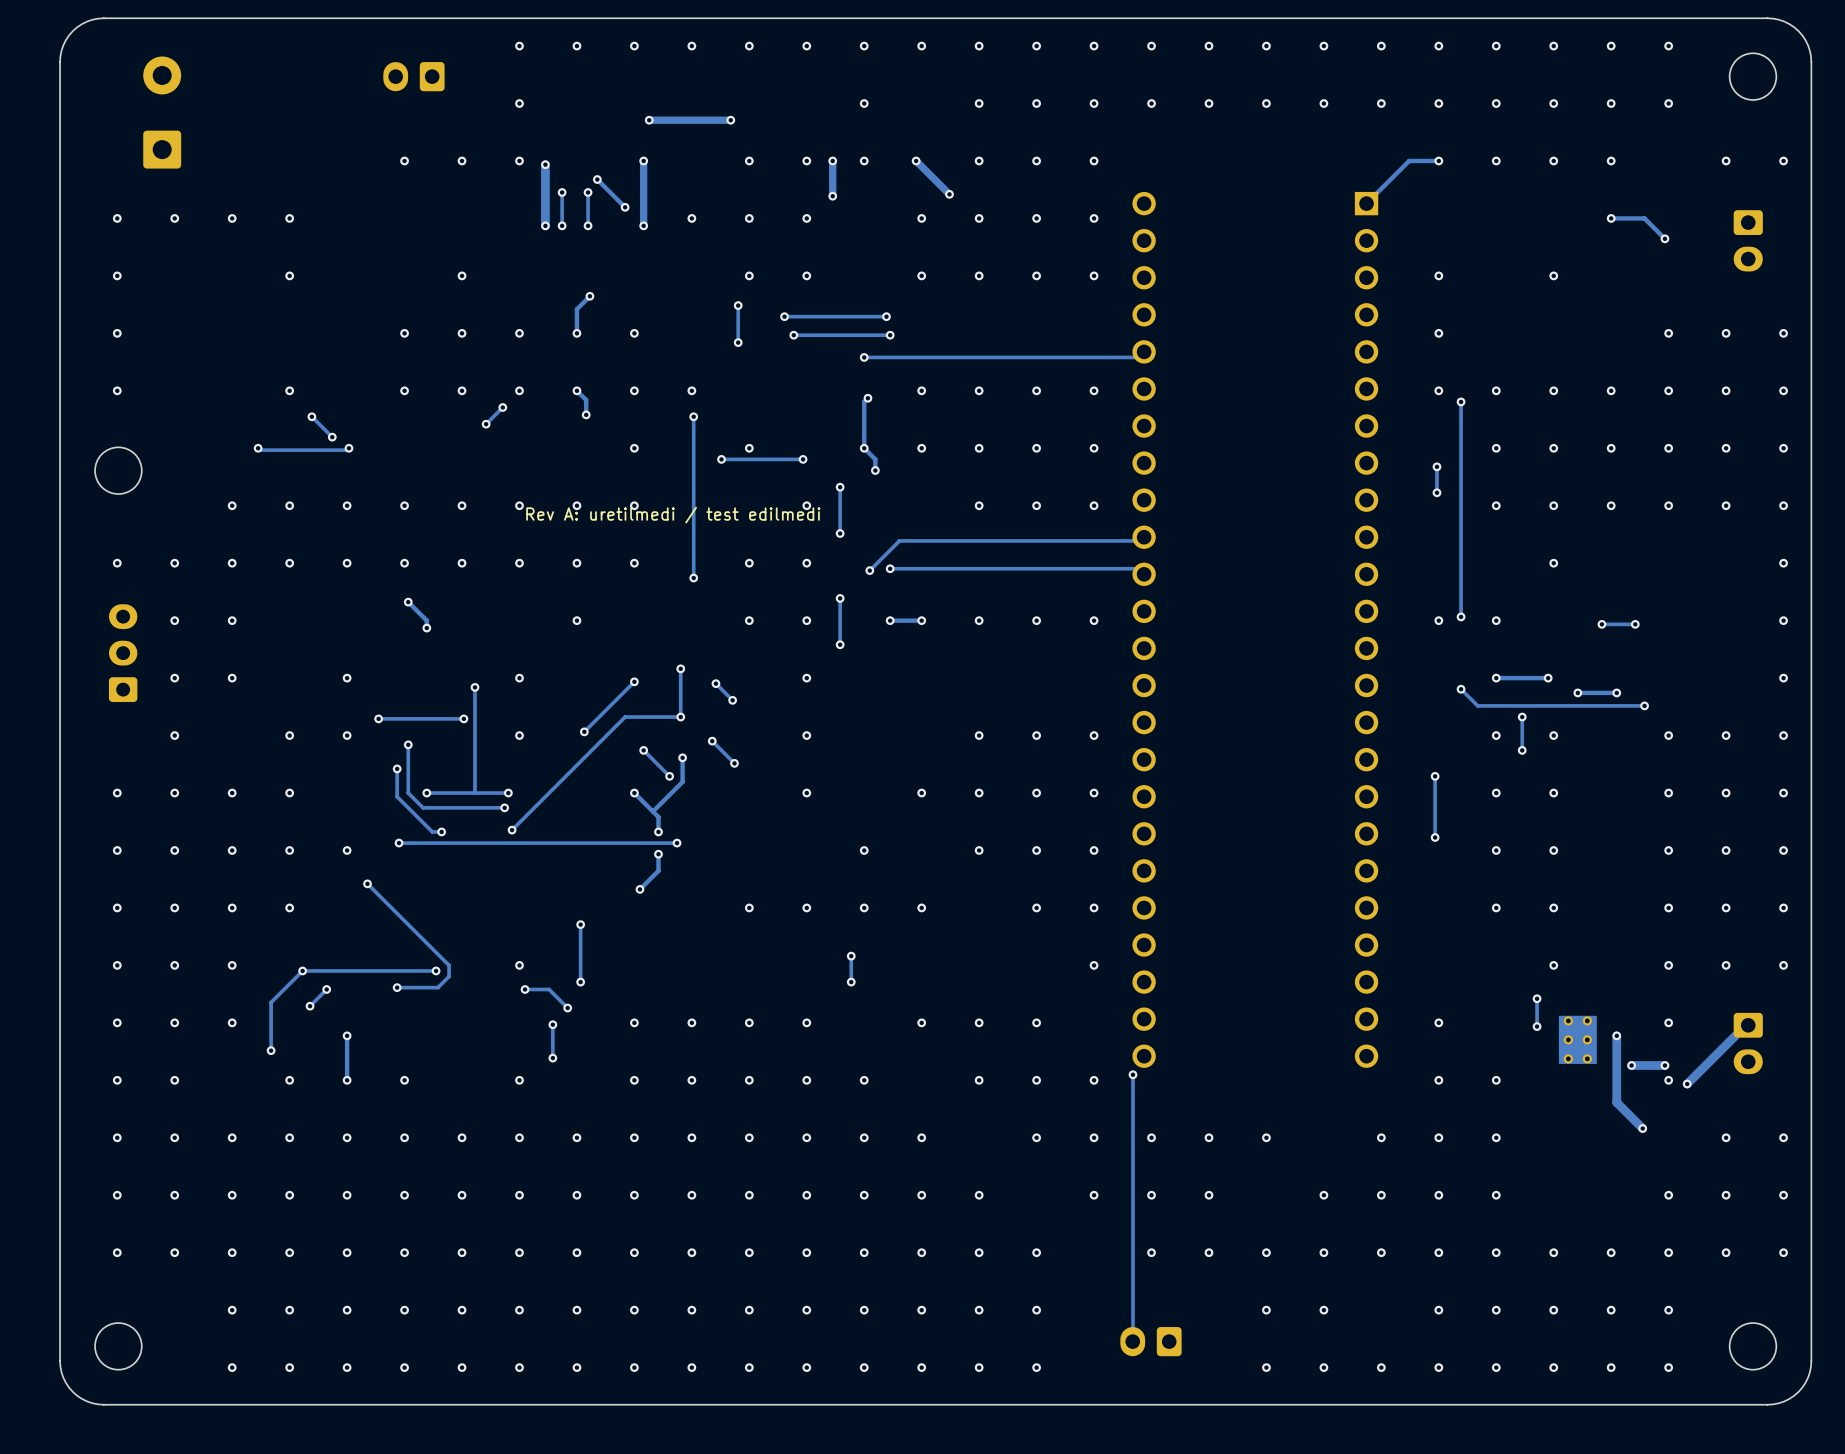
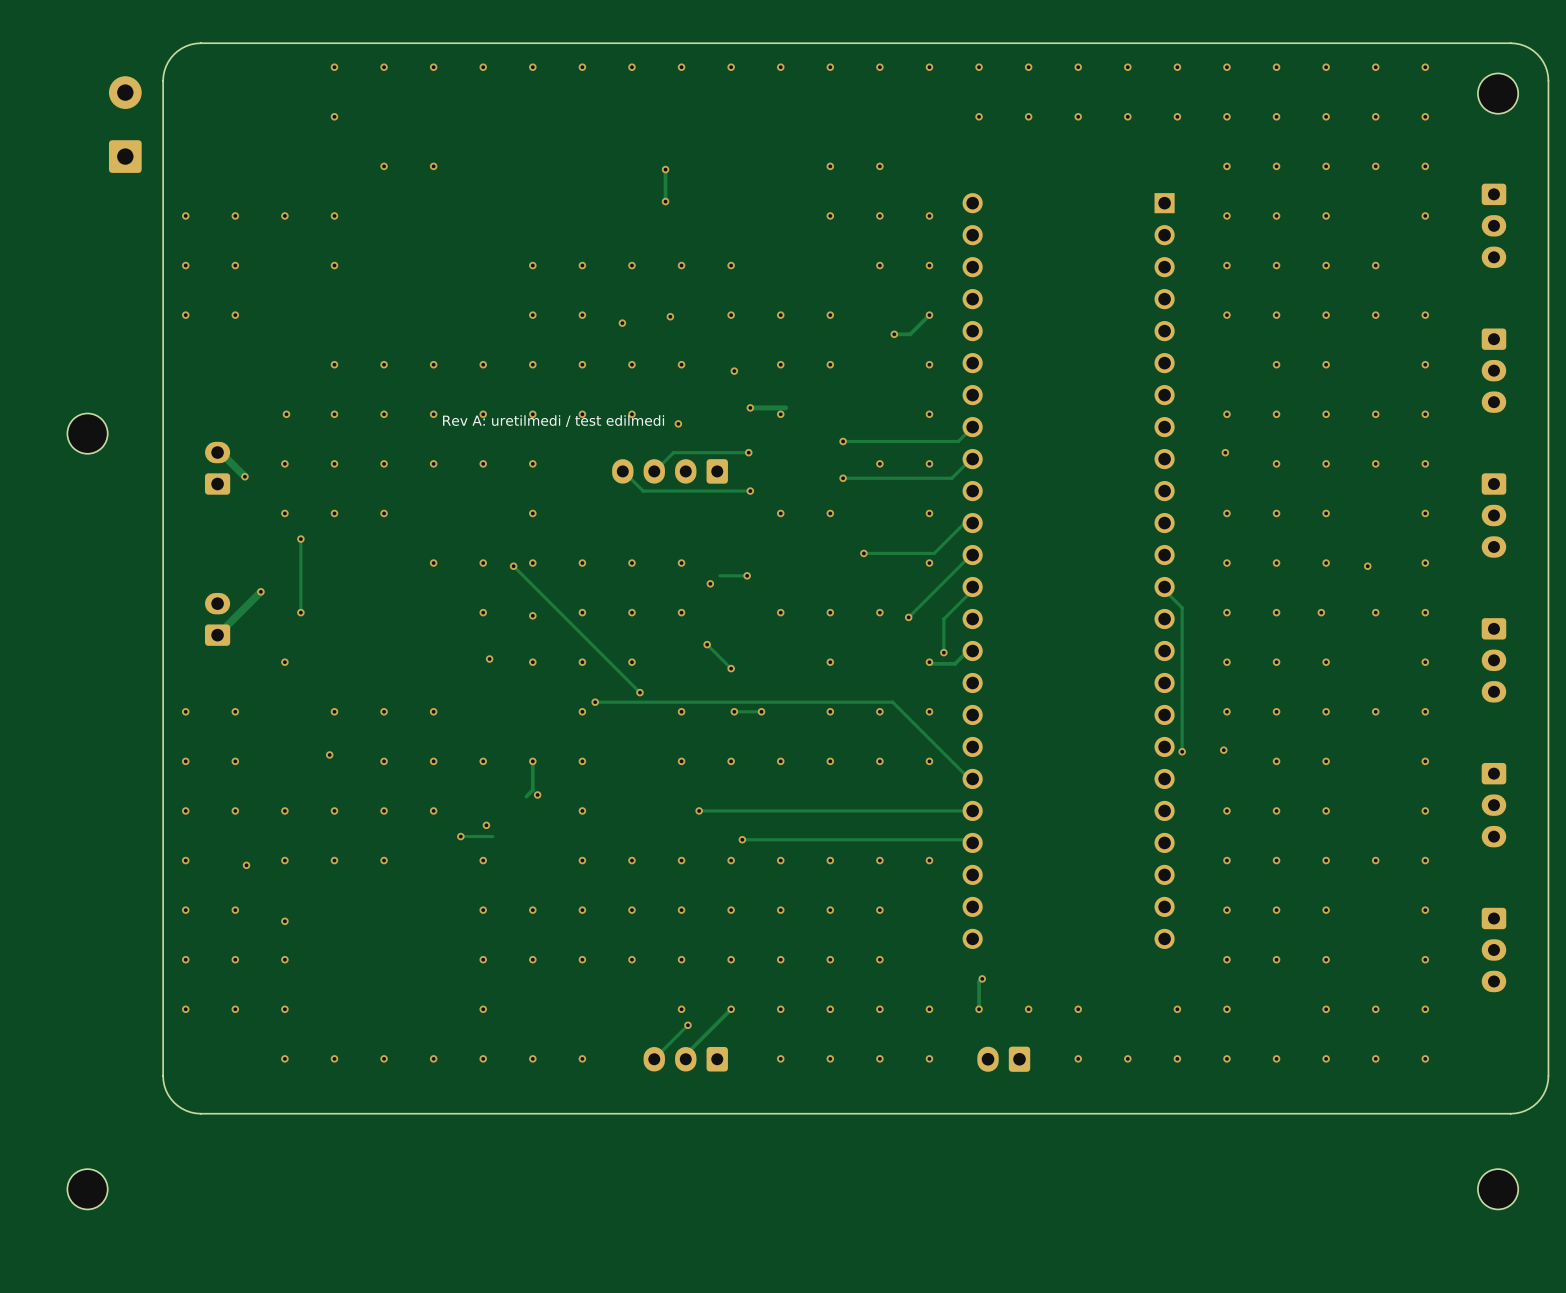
board edge: (249, 18) (92, 19) (72, 31) (63, 45) (60, 56) (60, 1360) (63, 1377) (77, 1395) (87, 1401) (103, 1404) (1773, 1404) (1789, 1398) (1798, 1391) (1809, 1372) (1811, 1215) -> (200, 43) (186, 46) (174, 54) (165, 66) (163, 81) (163, 1075) (165, 1090) (177, 1105) (191, 1112) (200, 1113) (1510, 1113) (1525, 1110) (1537, 1102) (1545, 1090) (1548, 1075)
via: none -> (334, 67)
via: none -> (384, 67)
part: (413, 76) -> none
via: none -> (334, 116)
via: (519, 103) -> none
via: (864, 103) -> none
via: (979, 103) -> none
via: (1036, 103) -> none
via: (1094, 103) -> none
via: (649, 120) -> none
track: (730, 120) (649, 120) -> none
via: (730, 120) -> none
via: (404, 160) -> none
track: (643, 160) (643, 225) -> none
via: (643, 160) -> none
via: (749, 160) -> none
via position: (806, 160) -> (665, 169)
track: (832, 160) (832, 196) -> none
via: (832, 160) -> none
via: (864, 160) -> none
track: (916, 160) (949, 194) -> none
via: (916, 160) -> none
via: (1094, 160) -> none
track: (1438, 160) (1409, 160) (1366, 203) -> none
via: none -> (1425, 166)
via: (1726, 160) -> none
via: (1783, 160) -> none
track: (545, 164) (545, 225) -> none
via: (545, 164) -> none
track: (597, 179) (625, 207) -> none
via: (597, 179) -> none
track: (562, 192) (562, 225) -> none
via: (562, 192) -> none
track: (588, 192) (588, 225) -> none
via: (588, 192) -> none
via: (949, 194) -> none
via: (832, 196) -> none
via: none -> (665, 201)
via: (625, 207) -> none
part footprint: [1733, 210, 1763, 272] -> [1481, 183, 1507, 269]
via: (117, 218) -> none
via: (174, 218) -> none
via: none -> (284, 215)
via: none -> (334, 215)
via: (691, 218) -> none
via: (749, 218) -> none
via: (806, 218) -> none
via: (921, 218) -> none
via: none -> (1226, 215)
via: none -> (1276, 215)
via: none -> (1326, 215)
track: (1611, 218) (1644, 218) (1664, 238) -> none
via: (1611, 218) -> none
via: (545, 225) -> none
via: (562, 225) -> none
via: (588, 225) -> none
via: (643, 225) -> none
via position: (1664, 238) -> (1425, 215)
via: (117, 275) -> none
via: none -> (185, 265)
via: none -> (334, 265)
via: (462, 275) -> none
via: none -> (532, 265)
via: none -> (582, 265)
via: none -> (731, 265)
via: (921, 275) -> none
via: (979, 275) -> none
via: none -> (1276, 265)
via: none -> (1375, 265)
track: (589, 296) (576, 309) (576, 333) -> none
via: (589, 296) -> none
track: (738, 305) (738, 342) -> (665, 169) (665, 201)
via: (738, 305) -> none
via: (784, 316) -> none
track: (886, 316) (784, 316) -> none
via: (886, 316) -> none
via: (117, 333) -> none
via: none -> (185, 315)
via: none -> (235, 315)
via: (404, 333) -> none
via: (462, 333) -> none
via: (519, 333) -> none
via: (576, 333) -> none
via: none -> (582, 315)
via: none -> (731, 315)
via: none -> (780, 315)
via: none -> (830, 315)
track: none -> (929, 315) (910, 334) (894, 334)
via: none -> (929, 315)
via: none -> (1276, 315)
via: none -> (1326, 315)
via: none -> (1375, 315)
via: (1726, 333) -> none
via: (1783, 333) -> none
track: (890, 335) (793, 335) -> none
via: (890, 335) -> none
via: (864, 357) -> none
track: (1134, 357) (864, 357) -> none
via: (117, 390) -> none
via: (289, 390) -> none
track: (576, 390) (586, 400) (586, 414) -> none
via: none -> (631, 364)
via: none -> (681, 364)
via position: (1036, 390) -> (894, 334)
via: (1438, 390) -> none
via: (1611, 390) -> none
via: (1726, 390) -> none
via: (1783, 390) -> none
part: none -> (1493, 370)
track: (867, 398) (864, 401) (864, 448) (875, 459) (875, 470) -> none
track: (1461, 401) (1461, 616) -> none
via: (1461, 401) -> none
track: (502, 407) (486, 424) -> none
via: (502, 407) -> none
via position: (586, 414) -> (483, 414)
track: (311, 416) (332, 437) -> none
via: (311, 416) -> none
track: (693, 416) (693, 578) -> none
via: (693, 416) -> none
via: (486, 424) -> none
via: (332, 437) -> none
via: none -> (750, 407)
track: none -> (785, 407) (750, 407)
via: (258, 448) -> none
track: (348, 448) (347, 450) (259, 450) (258, 448) -> none
via: none -> (334, 414)
via: none -> (384, 414)
via: none -> (433, 414)
via: none -> (582, 414)
via: (864, 448) -> none
via: (979, 448) -> none
via: (1036, 448) -> none
via: (1726, 448) -> none
via: (1783, 448) -> none
via: (721, 459) -> none
track: (803, 459) (721, 459) -> none
track: none -> (972, 427) (958, 441) (843, 441)
track: (1436, 466) (1436, 492) -> none
via position: (1436, 466) -> (1226, 414)
via: (875, 470) -> none
via: none -> (843, 441)
track: (840, 487) (840, 533) -> none
via: (840, 487) -> none
track: none -> (217, 452) (225, 457) (244, 476)
track: none -> (748, 452) (673, 452) (654, 471)
via: none -> (748, 452)
track: none -> (972, 459) (951, 478) (843, 478)
via: (232, 505) -> none
via position: (289, 505) -> (244, 476)
via: (806, 505) -> none
via: (979, 505) -> none
via: (1726, 505) -> none
via: (1783, 505) -> none
part: none -> (217, 468)
track: none -> (622, 471) (643, 491) (750, 491)
part: none -> (670, 471)
text position: Rev A: uretilmedi / test edilmedi (673, 515) -> Rev A: uretilmedi / test edilmedi (553, 421)
via: none -> (843, 478)
via: (840, 533) -> none
via: none -> (750, 491)
track: (1144, 537) (1134, 540) (899, 540) (869, 570) -> none
via: (117, 563) -> none
via: (174, 563) -> none
via: (232, 563) -> none
via: (289, 563) -> none
via: (519, 563) -> none
via: (576, 563) -> none
via: (749, 563) -> none
via: (806, 563) -> none
via: none -> (780, 513)
via: none -> (830, 513)
via: none -> (929, 513)
via: none -> (1226, 513)
via: none -> (1276, 513)
via: none -> (1425, 513)
via: (1783, 563) -> none
part: none -> (1493, 515)
track: (890, 568) (1134, 568) (1144, 574) -> (863, 553) (934, 553) (964, 523) (972, 523)
via: (890, 568) -> none
via: (869, 570) -> none
via: (693, 578) -> none
track: none -> (300, 539) (300, 612)
via: none -> (300, 539)
track: (840, 598) (840, 644) -> none
via: (840, 598) -> none
track: (408, 602) (426, 620) (426, 628) -> none
via: (408, 602) -> none
via: none -> (863, 553)
track: none -> (972, 555) (908, 617)
via: (1461, 616) -> none
via: (174, 620) -> none
via: (232, 620) -> none
via: none -> (433, 563)
via: none -> (532, 563)
via: none -> (582, 563)
via position: (890, 620) -> (747, 575)
track: (921, 620) (890, 620) -> (747, 575) (719, 575)
via: (921, 620) -> none
via: (979, 620) -> none
via: (1036, 620) -> none
via: none -> (1326, 563)
via: none -> (1425, 563)
via: (1783, 620) -> none
track: none -> (513, 566) (639, 692)
via: none -> (513, 566)
track: (1635, 624) (1601, 624) -> none
via: (1635, 624) -> none
via: (426, 628) -> none
track: none -> (972, 587) (967, 595) (943, 619) (943, 652)
track: none -> (1164, 587) (1169, 595) (1182, 607) (1182, 751)
part: (123, 653) -> none
track: none -> (260, 591) (217, 635)
via: none -> (260, 591)
track: (680, 668) (680, 717) (625, 717) (512, 830) -> none
via: (680, 668) -> none
via: (174, 678) -> none
via: (232, 678) -> none
via: (347, 678) -> none
via: none -> (300, 612)
via: (519, 678) -> none
via: none -> (483, 612)
via: none -> (582, 612)
via: none -> (631, 612)
via: none -> (780, 612)
via: none -> (830, 612)
via: none -> (879, 612)
track: (1548, 678) (1496, 678) -> none
via: none -> (1425, 612)
via: (1783, 678) -> none
track: (634, 681) (584, 731) -> none
track: (715, 683) (732, 700) -> none
via: (715, 683) -> none
via: none -> (908, 617)
part: none -> (217, 619)
track: (475, 687) (475, 793) -> none
via: (475, 687) -> none
track: (1461, 689) (1477, 705) (1644, 705) -> none
via position: (1461, 689) -> (1226, 612)
via: (1577, 692) -> none
track: (1616, 692) (1577, 692) -> none
via position: (1616, 692) -> (1375, 612)
via: (732, 700) -> none
via: (1644, 705) -> none
track: none -> (707, 644) (731, 668)
via: none -> (707, 644)
via: (680, 717) -> none
track: (1522, 717) (1522, 750) -> none
via: (1522, 717) -> none
via: (378, 718) -> none
track: (463, 718) (378, 718) -> none
via: (463, 718) -> none
track: none -> (972, 651) (964, 654) (955, 663) (929, 662)
via: none -> (943, 652)
part: none -> (1493, 660)
via: (174, 735) -> none
via: (289, 735) -> none
via: (519, 735) -> none
via: none -> (582, 662)
via: none -> (631, 662)
via: (806, 735) -> none
via: (1036, 735) -> none
via: none -> (1226, 662)
via: (1726, 735) -> none
via: (1783, 735) -> none
track: (712, 741) (734, 763) -> none
via: (712, 741) -> none
via: none -> (731, 668)
track: (408, 744) (408, 793) (423, 807) (504, 807) -> none
via: (408, 744) -> none
track: (643, 750) (669, 776) -> none
via position: (643, 750) -> (532, 662)
via: (1522, 750) -> none
track: (682, 757) (682, 781) (652, 811) -> none
via: (682, 757) -> none
via: (734, 763) -> none
track: (397, 768) (397, 796) (432, 831) (441, 831) -> none
via: (397, 768) -> none
via: none -> (639, 692)
via: (669, 776) -> none
track: (1435, 776) (1435, 837) -> none
via position: (1435, 776) -> (1226, 711)
track: none -> (595, 702) (892, 702) (964, 774) (972, 778)
via: none -> (595, 702)
via: (117, 793) -> none
via: (174, 793) -> none
via: none -> (334, 711)
via: (426, 793) -> none
via: none -> (384, 711)
track: (508, 793) (426, 793) -> none
via: (508, 793) -> none
via: none -> (433, 711)
track: (634, 793) (658, 817) (658, 831) -> none
via: (634, 793) -> none
via: none -> (582, 711)
via: none -> (734, 711)
track: none -> (761, 711) (734, 711)
via position: (921, 793) -> (761, 711)
via: none -> (1375, 711)
via: (1726, 793) -> none
via: (1783, 793) -> none
via: (504, 807) -> none
via: (512, 830) -> none
via: (441, 831) -> none
via: (658, 831) -> none
via: none -> (1182, 751)
track: (677, 843) (399, 843) -> none
via position: (677, 843) -> (582, 761)
via: (117, 850) -> none
via: (174, 850) -> none
via: (347, 850) -> none
via: none -> (384, 761)
via: none -> (433, 761)
via: none -> (483, 761)
track: none -> (532, 761) (532, 790) (526, 796)
via: none -> (532, 761)
via: none -> (681, 761)
via: none -> (780, 761)
via: (1726, 850) -> none
via: (1783, 850) -> none
track: (658, 854) (658, 870) (639, 889) -> none
via: (658, 854) -> none
track: (367, 883) (449, 965) (449, 976) (437, 987) (397, 987) -> none
via: (367, 883) -> none
part: none -> (1493, 805)
via: (117, 907) -> none
via: (174, 907) -> none
via: none -> (284, 810)
via: none -> (334, 810)
via: none -> (384, 810)
via: none -> (433, 810)
via: none -> (582, 810)
via: (749, 907) -> none
via: (806, 907) -> none
via: none -> (699, 810)
via: (864, 907) -> none
via: (921, 907) -> none
via: (1036, 907) -> none
via: (1094, 907) -> none
track: none -> (972, 810) (699, 810)
via: none -> (1226, 810)
via: (1726, 907) -> none
via: (1783, 907) -> none
track: (580, 924) (580, 982) -> none
via: none -> (460, 836)
track: none -> (492, 836) (460, 836)
track: none -> (742, 839) (964, 839) (972, 842)
via: none -> (742, 839)
track: (851, 956) (851, 982) -> none
via: (851, 956) -> none
via: (117, 965) -> none
via: (174, 965) -> none
via: none -> (284, 860)
via: none -> (334, 860)
via: none -> (384, 860)
via: (519, 965) -> none
via: none -> (582, 860)
via: none -> (631, 860)
via: none -> (681, 860)
via: none -> (731, 860)
via: none -> (780, 860)
via: none -> (830, 860)
via: none -> (879, 860)
via: none -> (1226, 860)
via: none -> (1276, 860)
via: none -> (1375, 860)
via: (1726, 965) -> none
via: (1783, 965) -> none
track: (436, 970) (302, 970) (271, 1002) (271, 1050) -> none
via: (436, 970) -> none
via position: (580, 982) -> (483, 860)
via: (851, 982) -> none
via: (397, 987) -> none
track: (326, 989) (310, 1006) -> none
via: (326, 989) -> none
track: (525, 989) (549, 989) (567, 1008) -> none
via: (525, 989) -> none
track: (1537, 998) (1537, 1026) -> none
via: (1537, 998) -> none
via: (310, 1006) -> none
via: (567, 1008) -> none
via: (117, 1022) -> none
via: (174, 1022) -> none
via: none -> (235, 910)
via: none -> (483, 910)
via: none -> (731, 910)
via: none -> (1276, 910)
via: none -> (1326, 910)
track: (552, 1024) (552, 1058) -> none
via: (552, 1024) -> none
via: (1537, 1026) -> none
track: (347, 1035) (347, 1080) -> none
track: (1616, 1035) (1616, 1102) (1642, 1128) -> none
via: (1616, 1035) -> none
track: (1735, 1035) (1687, 1084) -> none
part: (1577, 1039) -> none
part: (1748, 1043) -> none
via: (271, 1050) -> none
via: (552, 1058) -> none
via: (1631, 1065) -> none
track: (1664, 1065) (1631, 1065) -> none
via: (1664, 1065) -> none
part: none -> (1493, 949)
track: (1132, 1074) (1132, 1341) -> none
via: (1132, 1074) -> none
via: (117, 1080) -> none
via: (174, 1080) -> none
via: none -> (185, 959)
via: (404, 1080) -> none
via: (519, 1080) -> none
via: none -> (483, 959)
via: none -> (780, 959)
via: (1094, 1080) -> none
via: none -> (1326, 959)
via: (1687, 1084) -> none
track: none -> (982, 978) (979, 982) (979, 1009)
via: none -> (982, 978)
via: (1642, 1128) -> none
via: (117, 1137) -> none
via: (174, 1137) -> none
via: (404, 1137) -> none
via: (462, 1137) -> none
via: (519, 1137) -> none
via: (634, 1137) -> none
via: (691, 1137) -> none
via: (749, 1137) -> none
track: none -> (731, 1009) (691, 1049) (685, 1059)
via: none -> (830, 1009)
via: (1496, 1137) -> none
via: none -> (1326, 1009)
via: none -> (1375, 1009)
via: none -> (1425, 1009)
via: (1726, 1137) -> none
via: (1783, 1137) -> none
track: none -> (687, 1025) (654, 1059)
via: none -> (687, 1025)
via: (117, 1195) -> none
via: (174, 1195) -> none
via: (232, 1195) -> none
via: (289, 1195) -> none
via: (749, 1195) -> none
via: (806, 1195) -> none
part: none -> (685, 1059)
via: (864, 1195) -> none
via: none -> (879, 1058)
via: (1151, 1195) -> none
via: (1208, 1195) -> none
via: none -> (1078, 1058)
via: none -> (1326, 1058)
via: none -> (1375, 1058)
via: (1726, 1195) -> none
via: (1783, 1195) -> none
via: (117, 1252) -> none
via: (174, 1252) -> none
via: (232, 1252) -> none
via: (289, 1252) -> none
via: (347, 1252) -> none
via: (404, 1252) -> none
via: (462, 1252) -> none
via: (519, 1252) -> none
via: (576, 1252) -> none
via: (634, 1252) -> none
via: (691, 1252) -> none
via: (749, 1252) -> none
via: (806, 1252) -> none
via: (864, 1252) -> none
via: (921, 1252) -> none
via: (979, 1252) -> none
via: (1036, 1252) -> none
via: (1151, 1252) -> none
via: (1208, 1252) -> none
via: (1266, 1252) -> none
via: (1323, 1252) -> none
via: (1381, 1252) -> none
via: (1438, 1252) -> none
via: (1496, 1252) -> none
via: (1553, 1252) -> none
via: (1611, 1252) -> none
via: (1668, 1252) -> none
via: (1726, 1252) -> none
via: (1783, 1252) -> none
via: (232, 1310) -> none
via: (289, 1310) -> none
via: (347, 1310) -> none
via: (404, 1310) -> none
via: (462, 1310) -> none
via: (519, 1310) -> none
via: (576, 1310) -> none
via: (634, 1310) -> none
via: (691, 1310) -> none
via: (749, 1310) -> none
via: (806, 1310) -> none
via: (864, 1310) -> none
via: (921, 1310) -> none
via: (979, 1310) -> none
via: (1036, 1310) -> none
via: (1266, 1310) -> none
via: (1323, 1310) -> none
via: (1438, 1310) -> none
via: (1496, 1310) -> none
via: (1553, 1310) -> none
via: (1611, 1310) -> none
via: (1668, 1310) -> none
part position: (1150, 1341) -> (1003, 1059)
via: (232, 1367) -> none
via: (289, 1367) -> none
via: (347, 1367) -> none
via: (404, 1367) -> none
via: (462, 1367) -> none
via: (519, 1367) -> none
via: (576, 1367) -> none
via: (634, 1367) -> none
via: (691, 1367) -> none
via: (749, 1367) -> none
via: (806, 1367) -> none
via: (864, 1367) -> none
via: (921, 1367) -> none
via: (979, 1367) -> none
via: (1036, 1367) -> none
via: (1266, 1367) -> none
via: (1323, 1367) -> none
via: (1381, 1367) -> none
via: (1438, 1367) -> none
via: (1496, 1367) -> none
via: (1553, 1367) -> none
via: (1611, 1367) -> none
via: (1668, 1367) -> none

